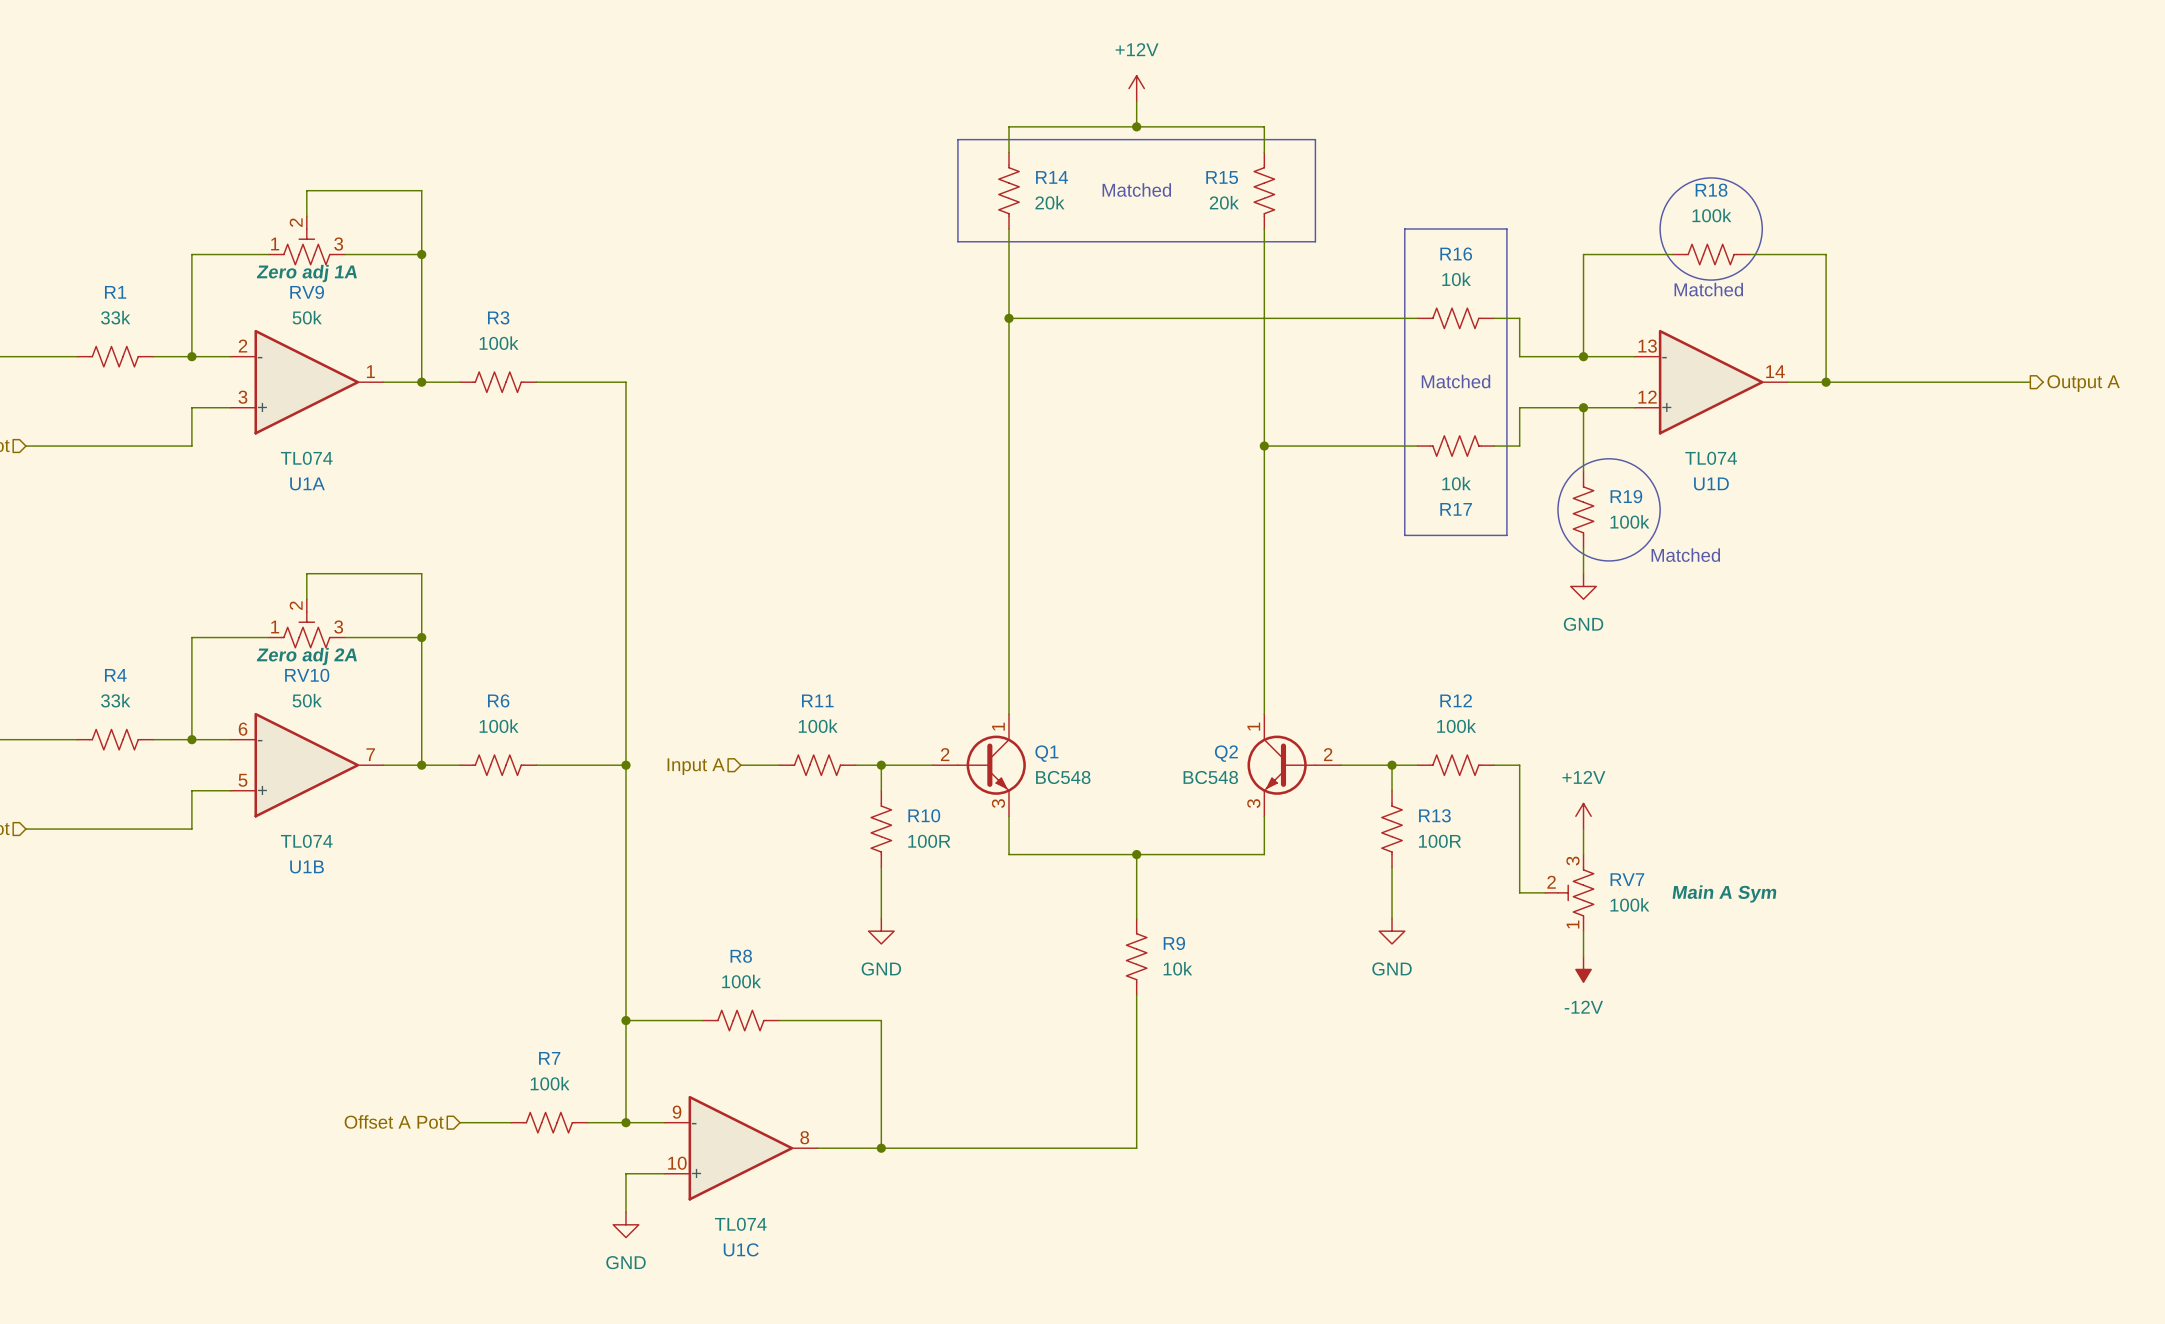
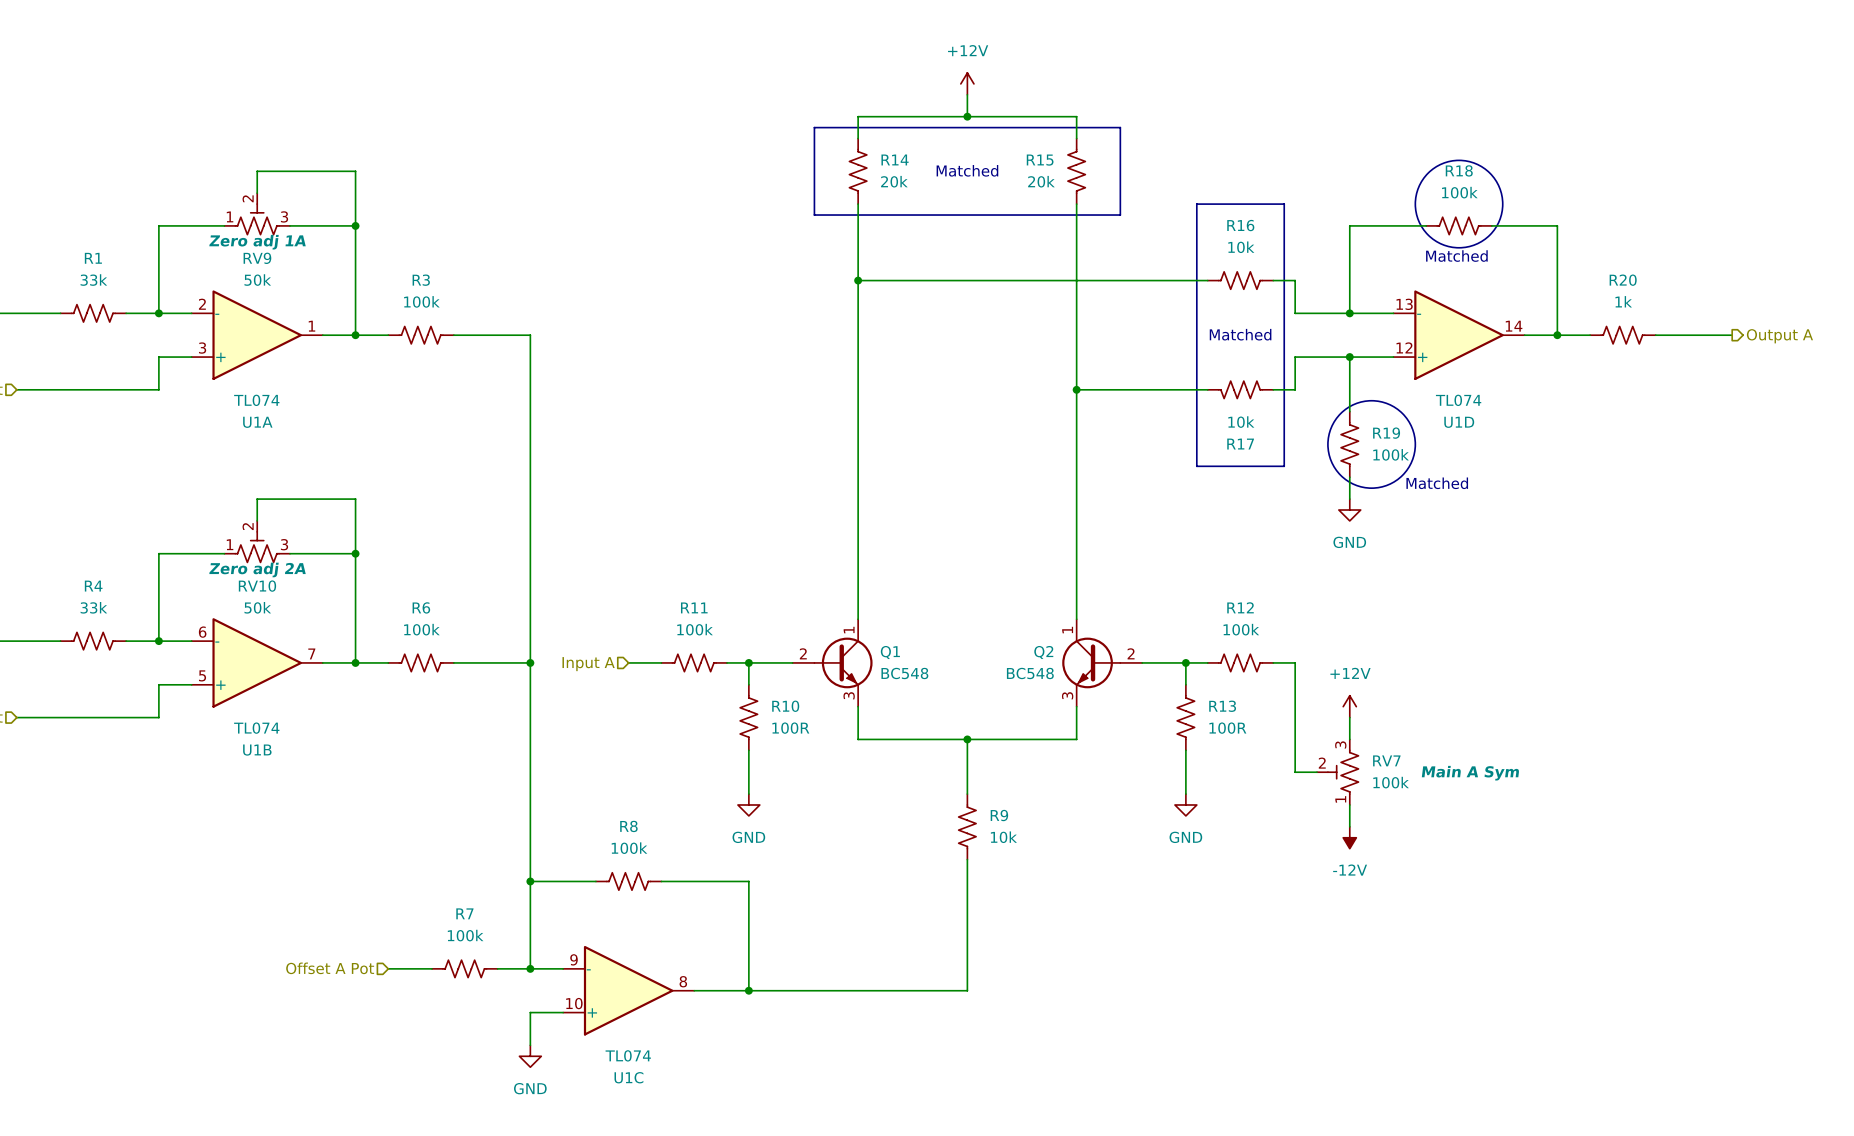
R20: none -> 1k (1622, 335)

